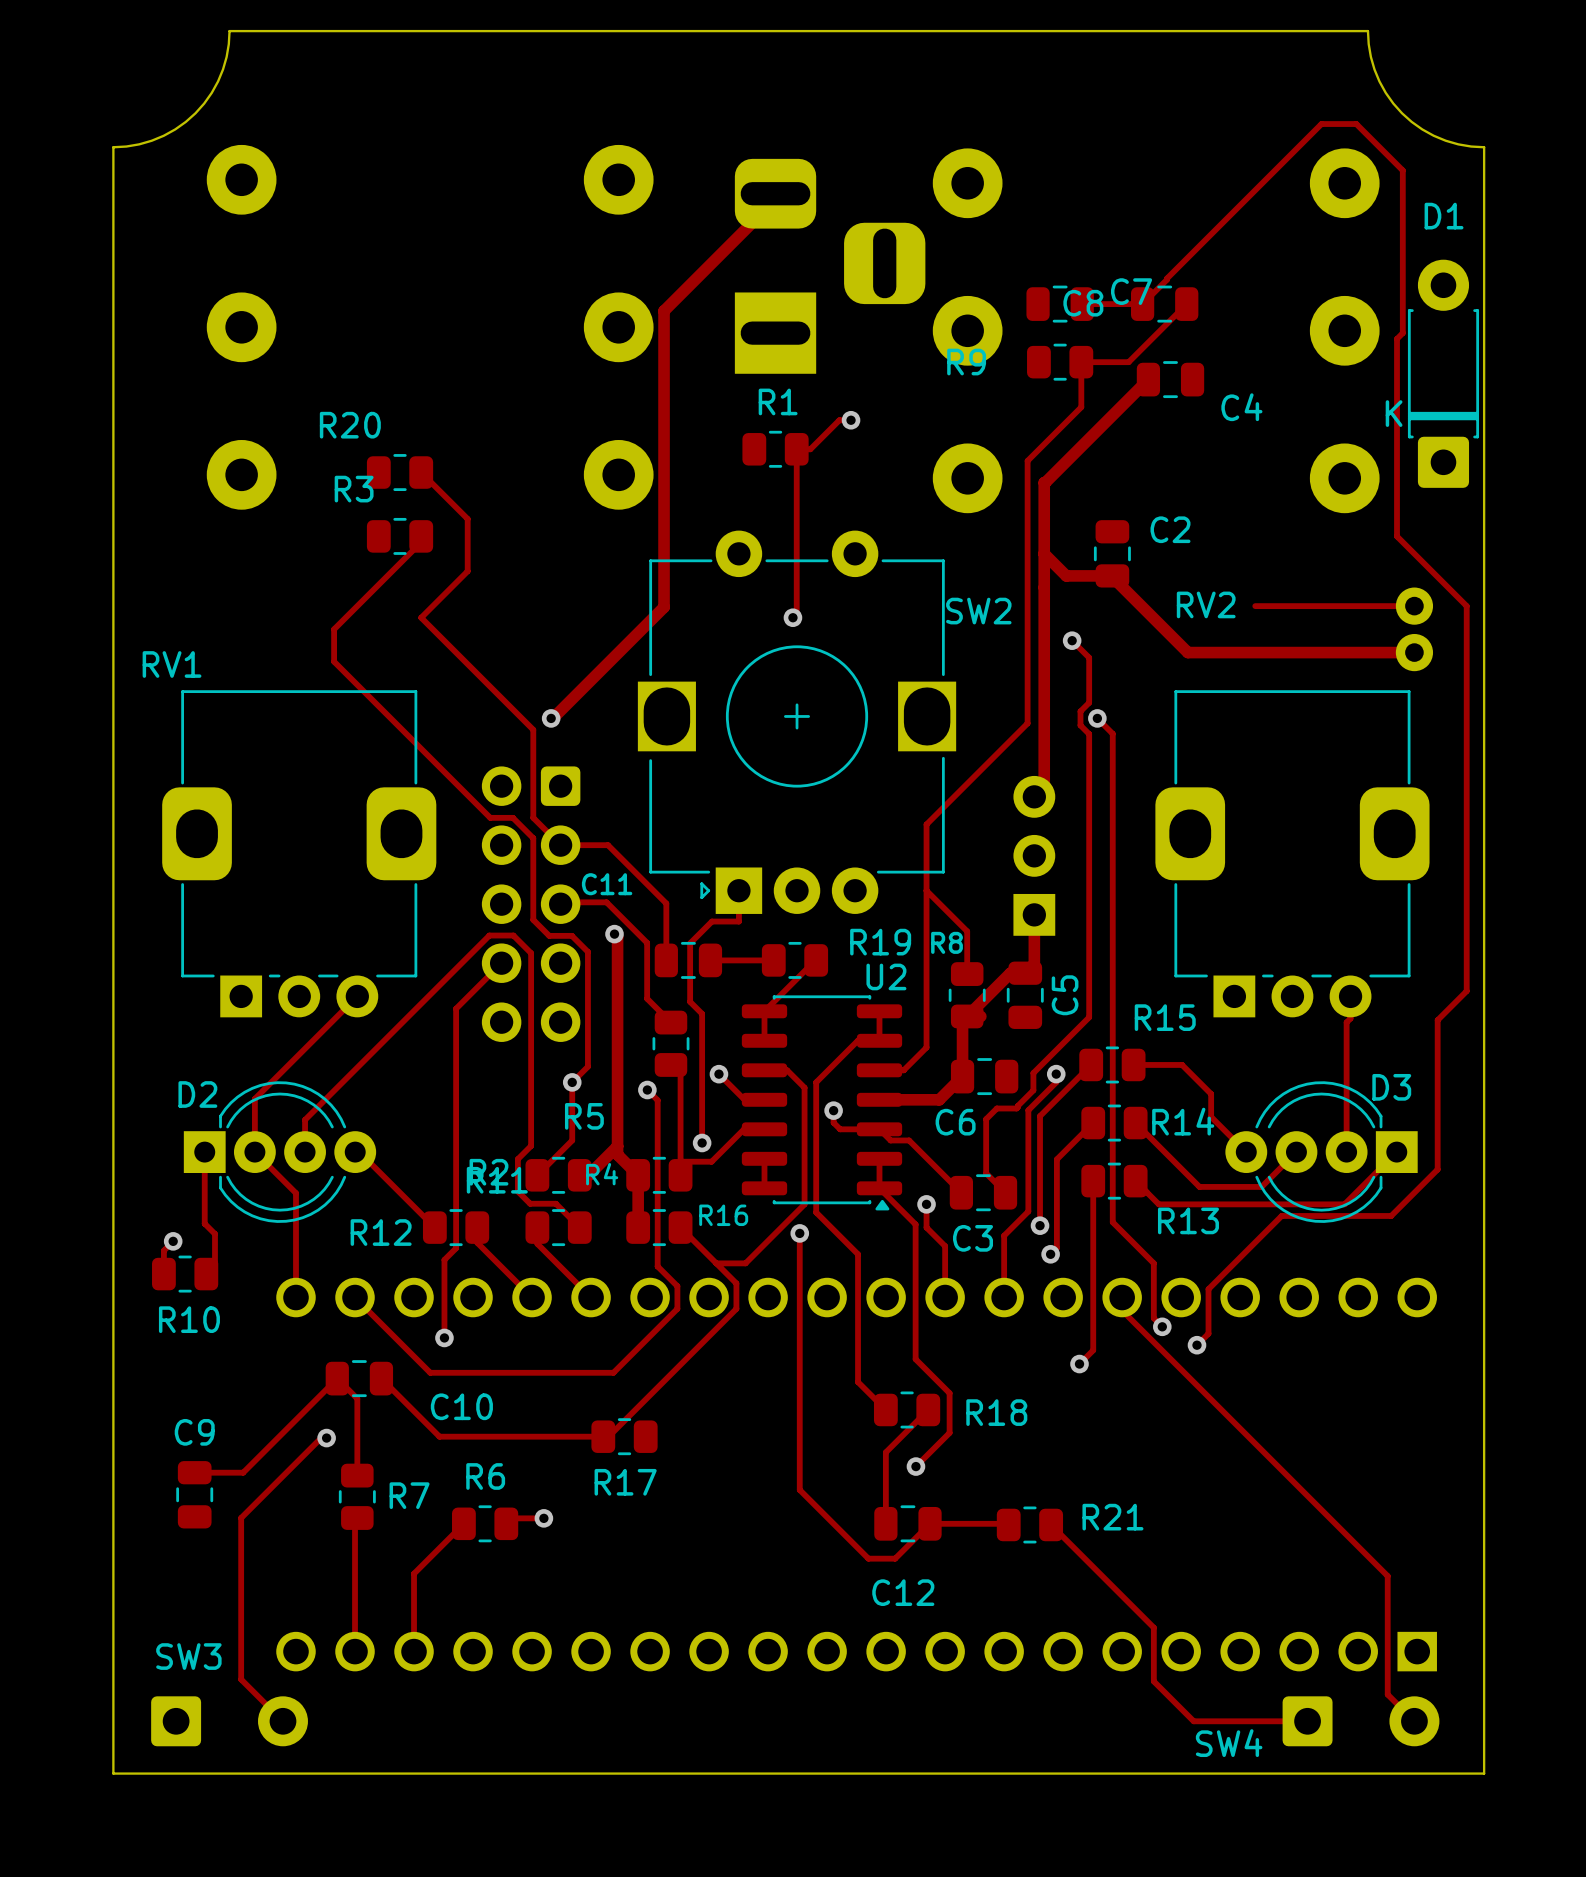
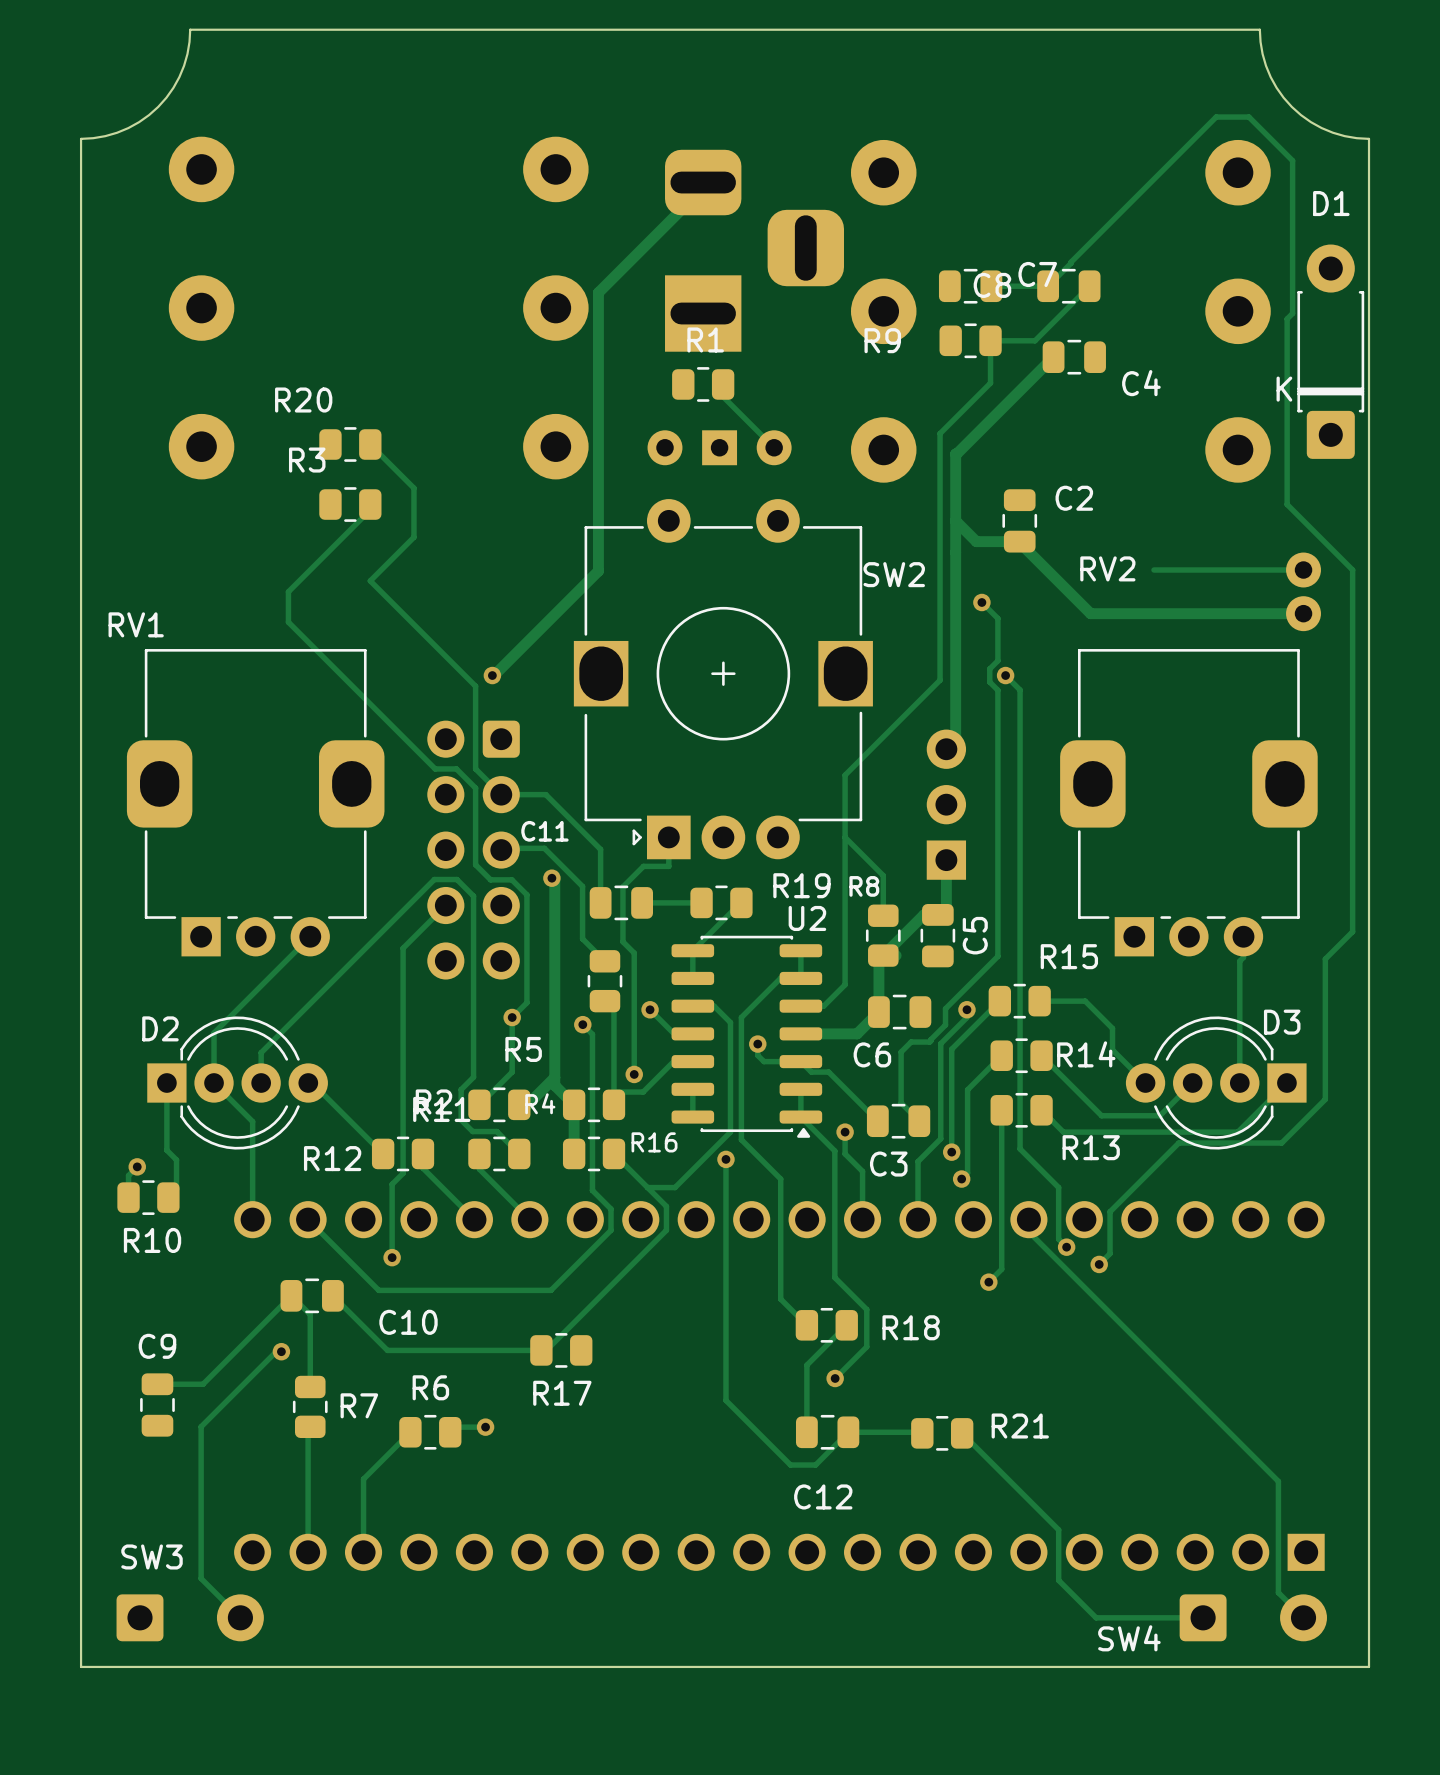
track: none -> (723, 384) (723, 396) (774, 447)
track: (851, 420) (839, 420) (810, 449) (796, 449) (796, 613) (792, 617) -> none
via: (851, 420) -> none
R1 position: (775, 449) -> (703, 384)
part: none -> (719, 447)
via: (792, 617) -> none

